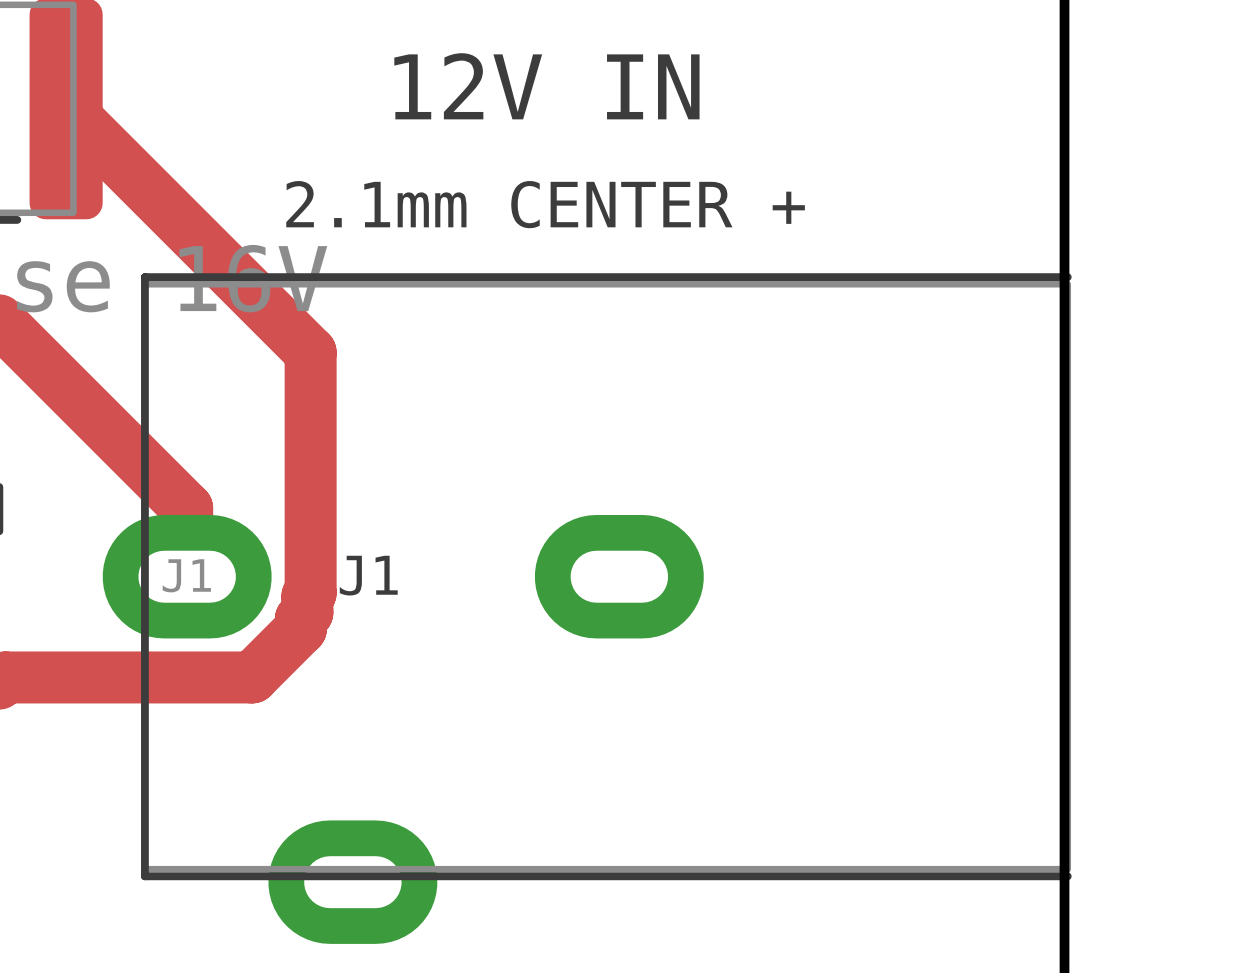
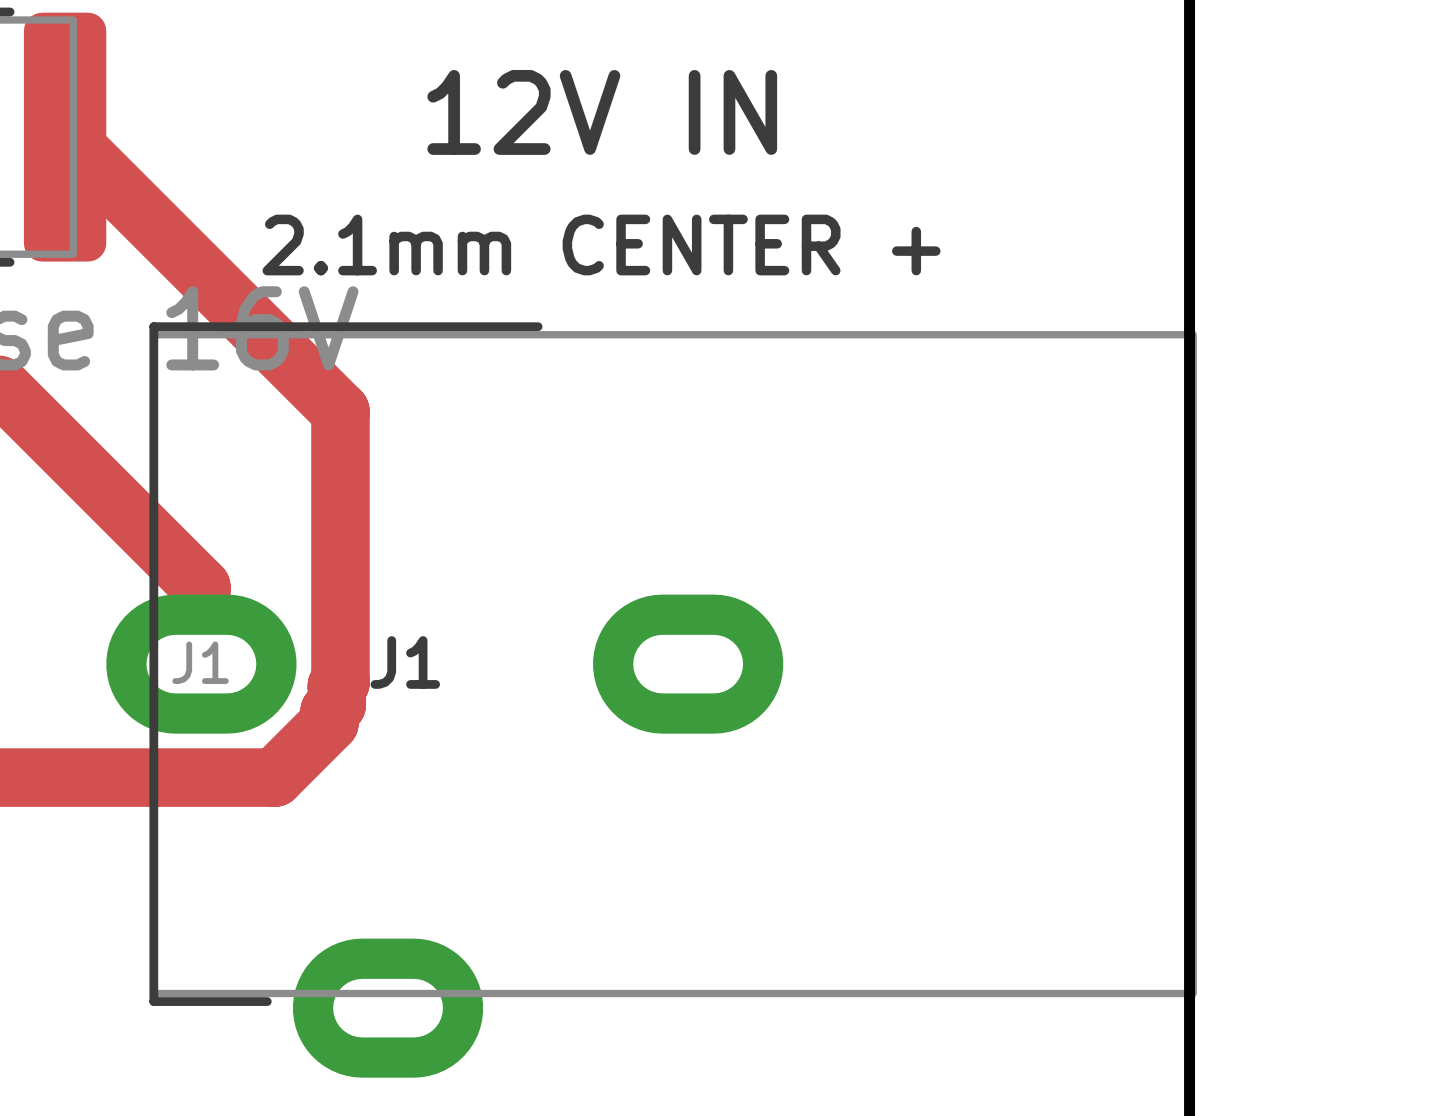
J1 footprint: [102, 273, 1072, 944] -> [106, 322, 1197, 1078]

